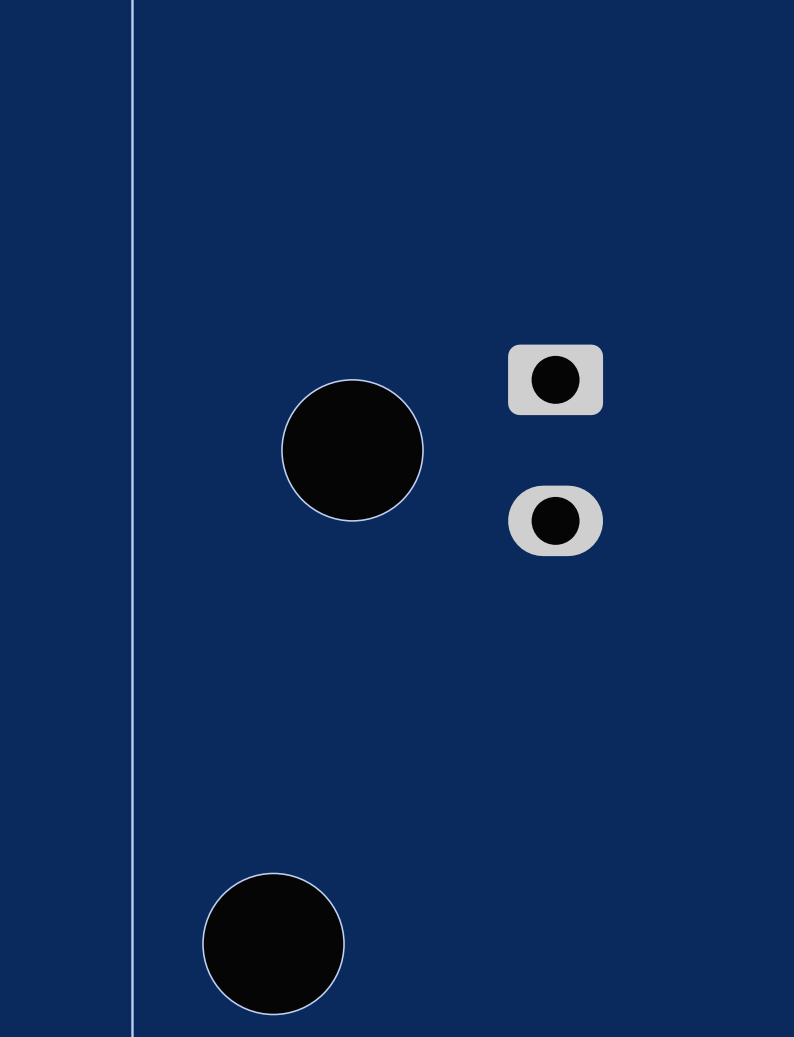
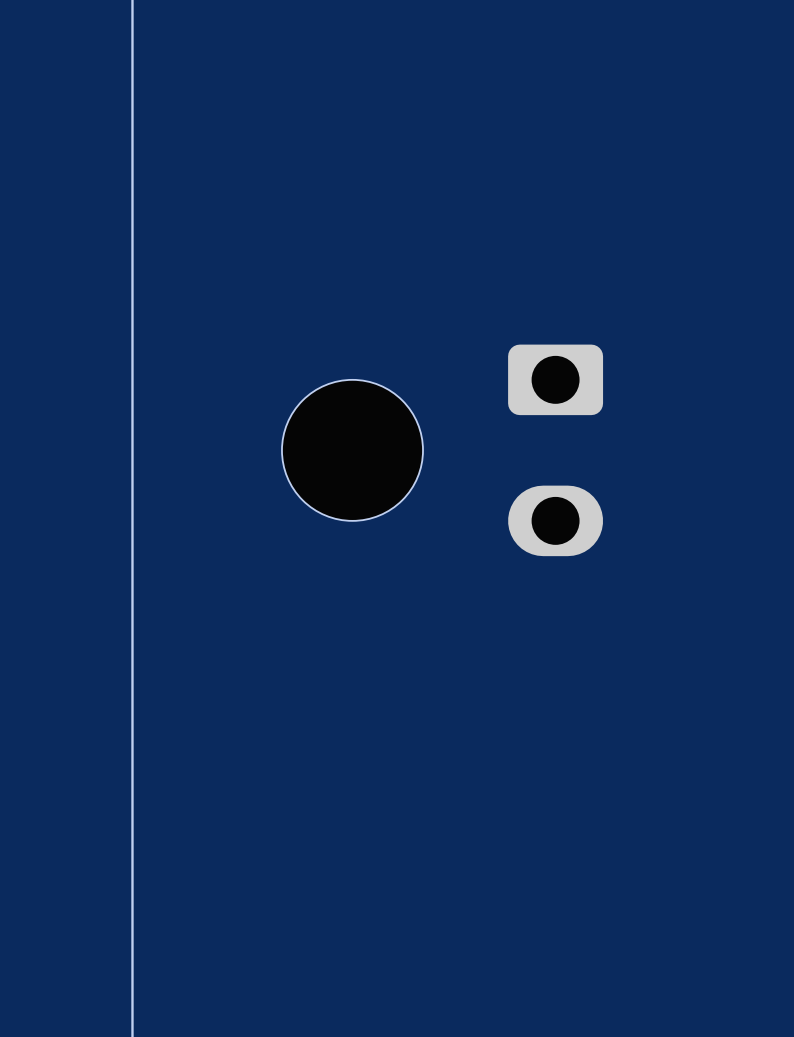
part: (273, 943) -> none

